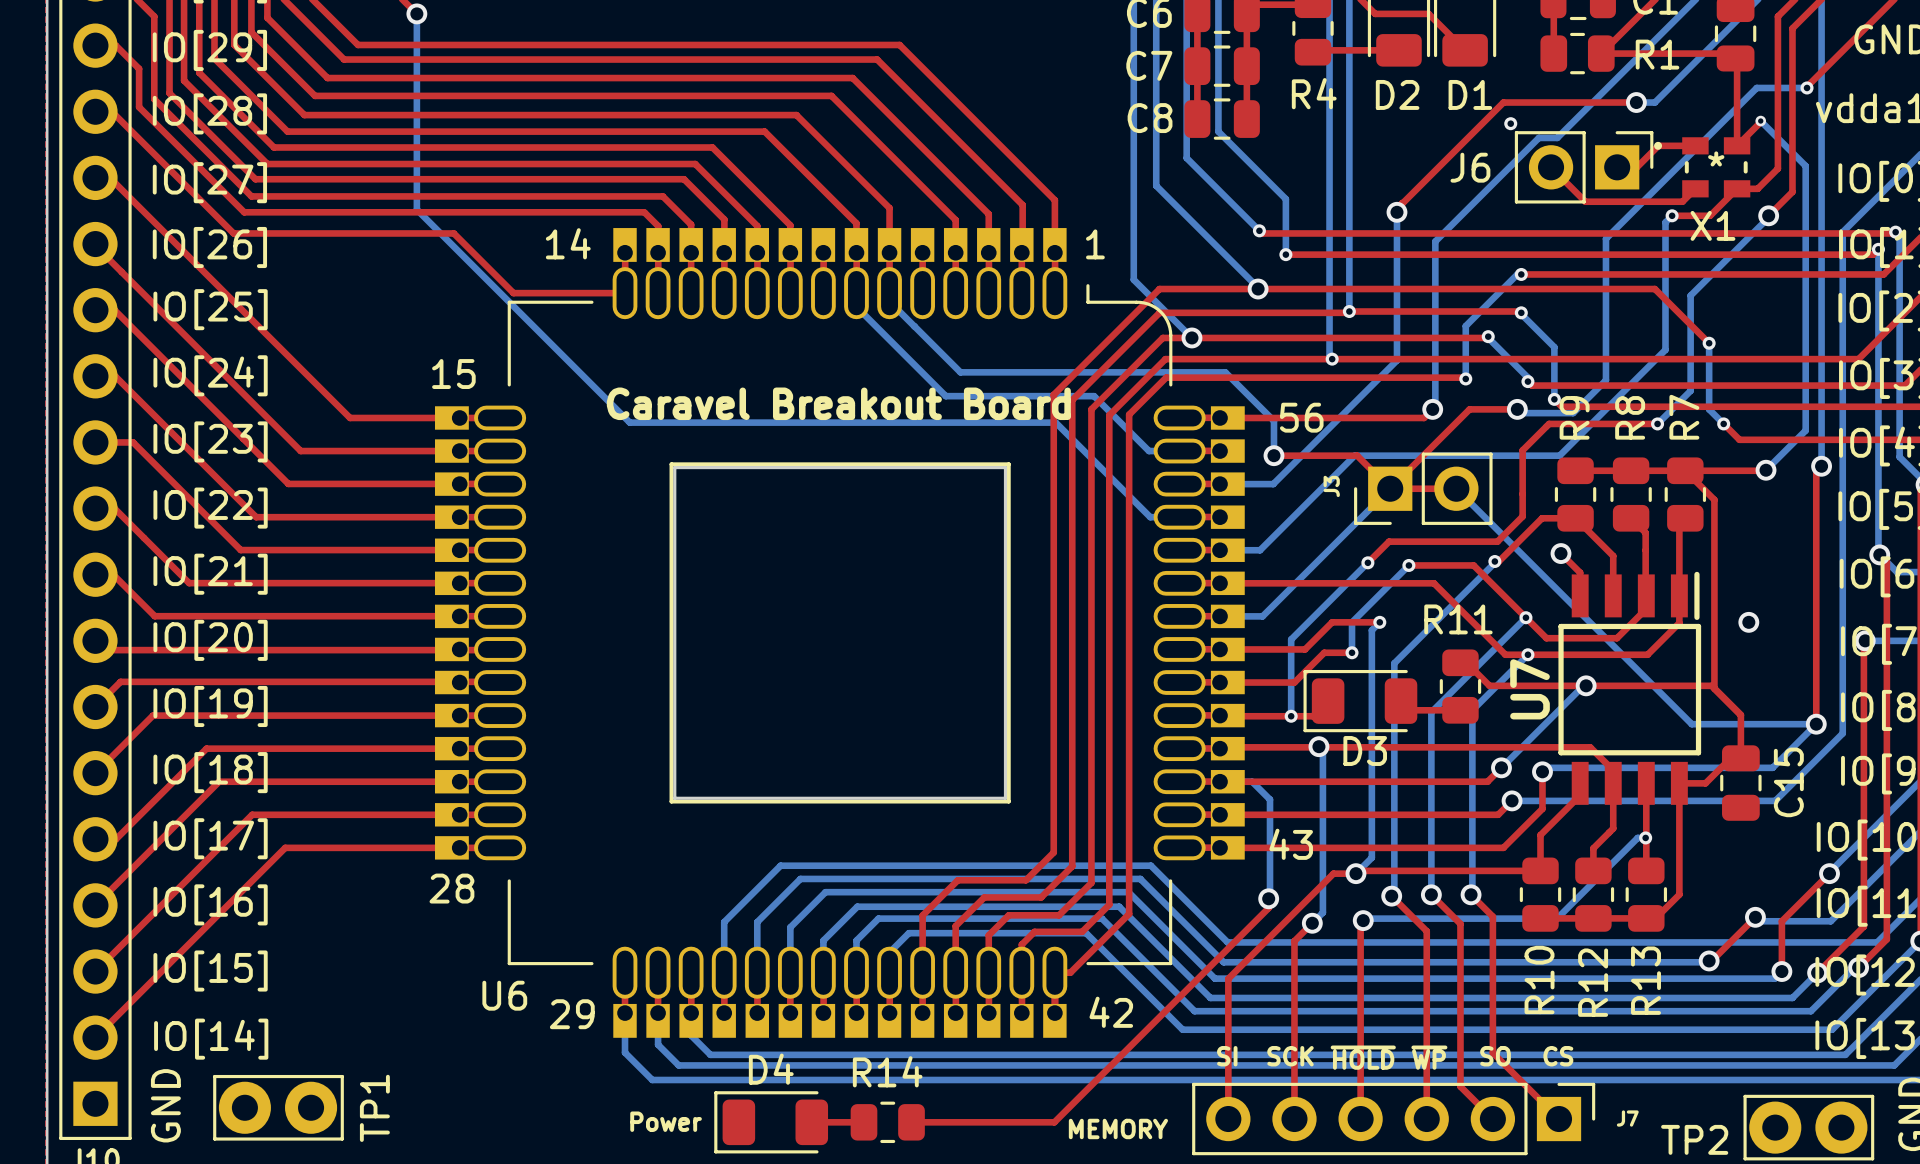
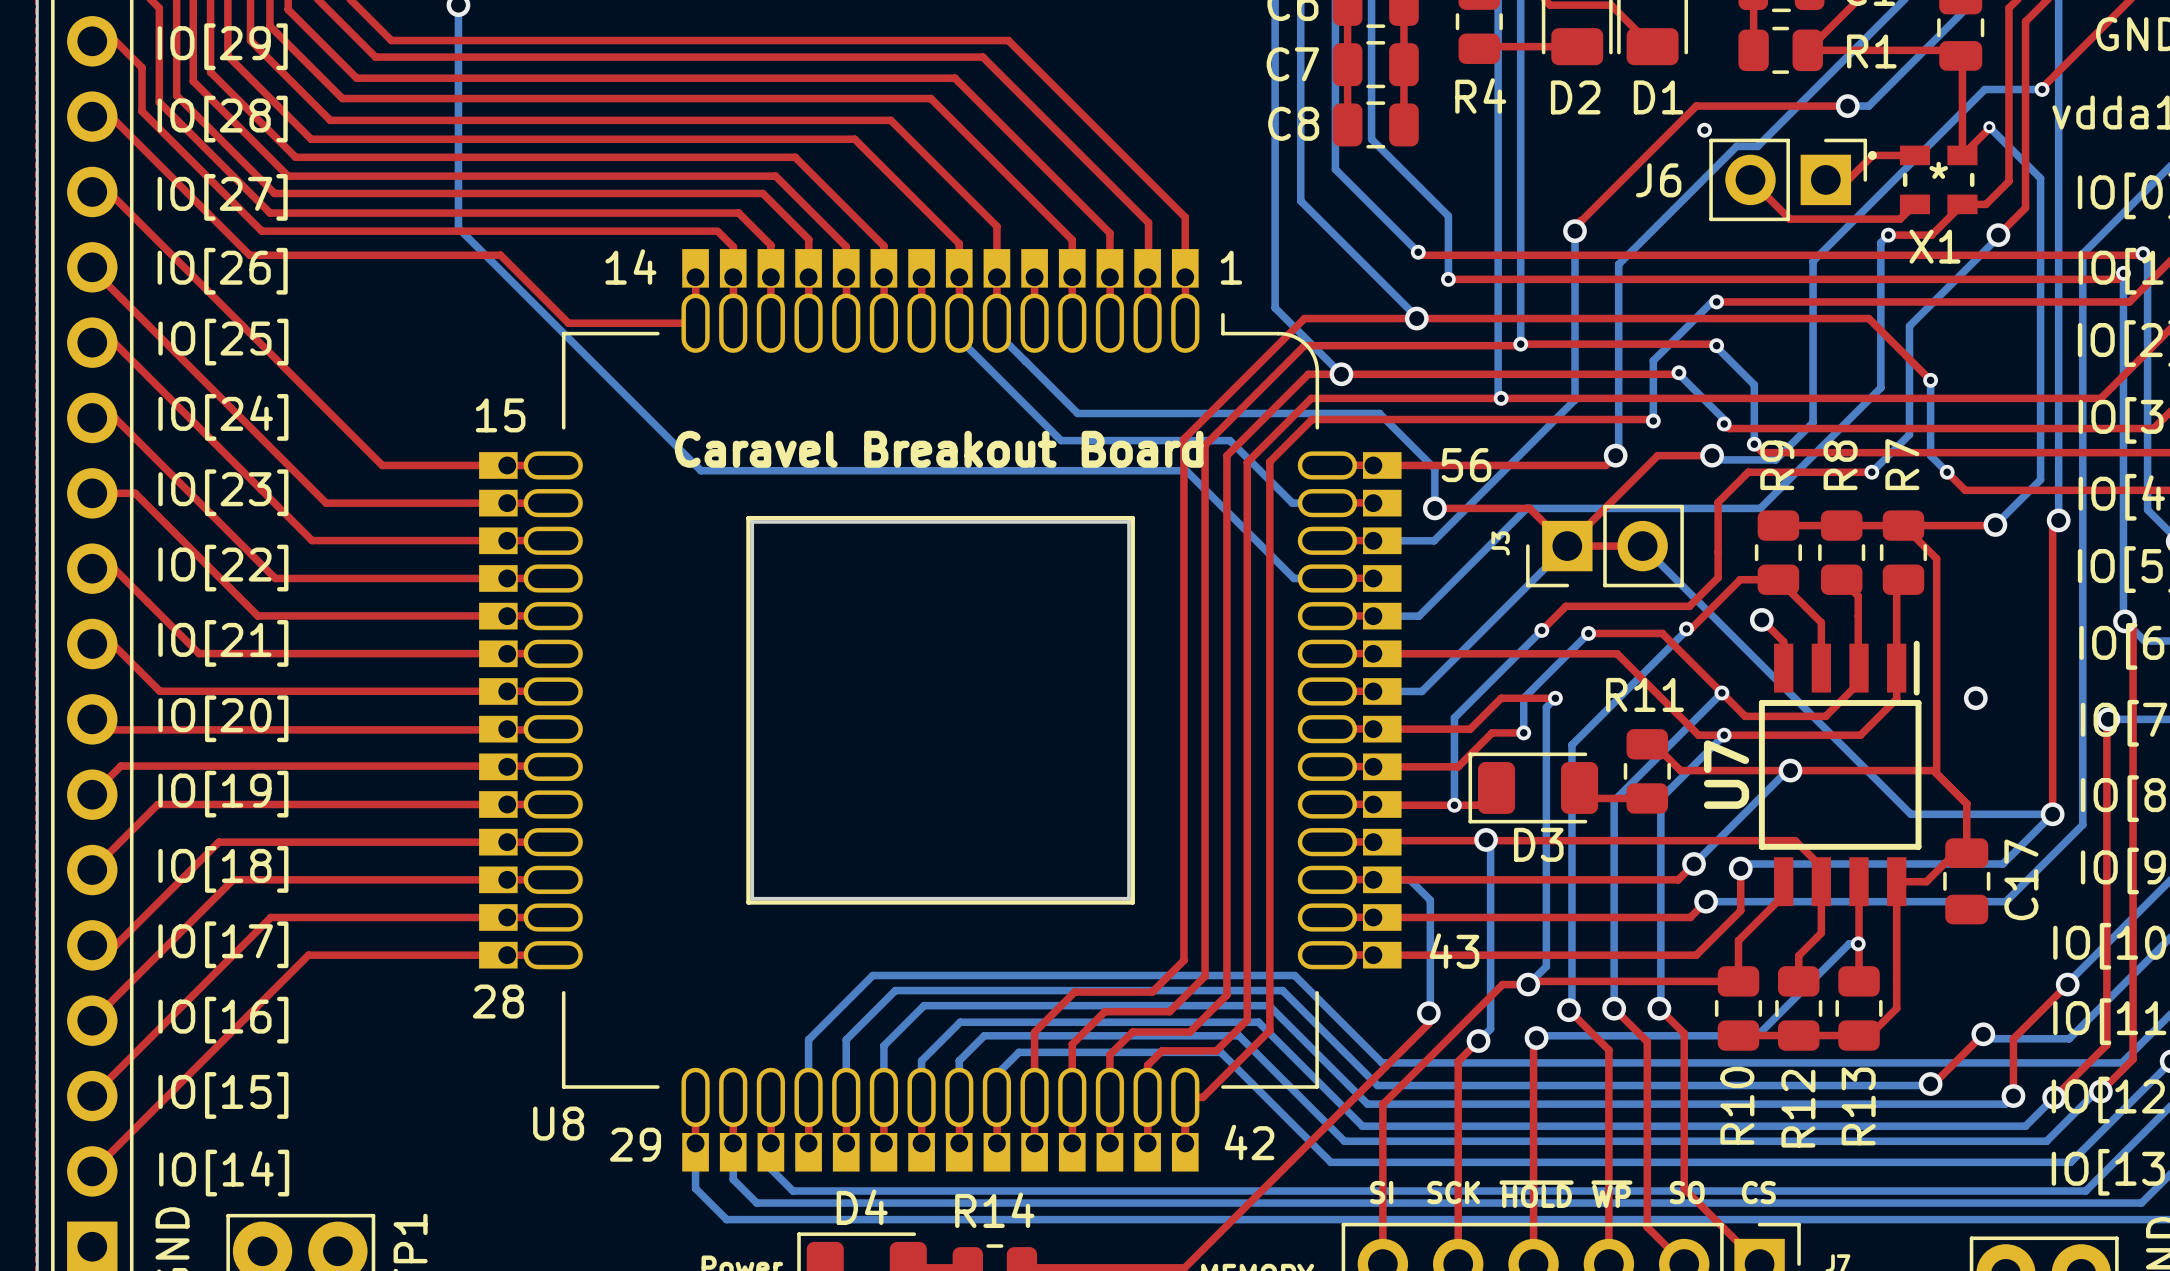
C15 name: C15 (1788, 782) -> C17 (2021, 879)
U6 name: U6 (504, 995) -> U8 (558, 1123)

